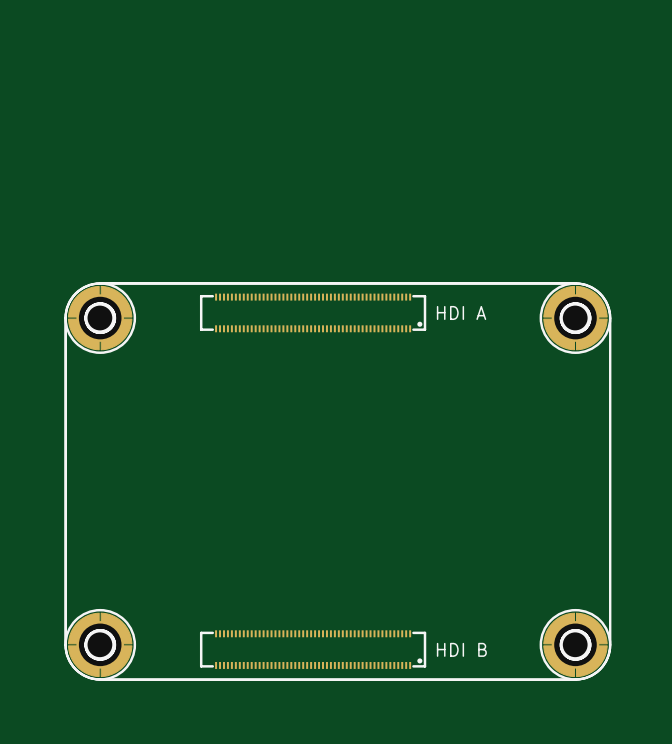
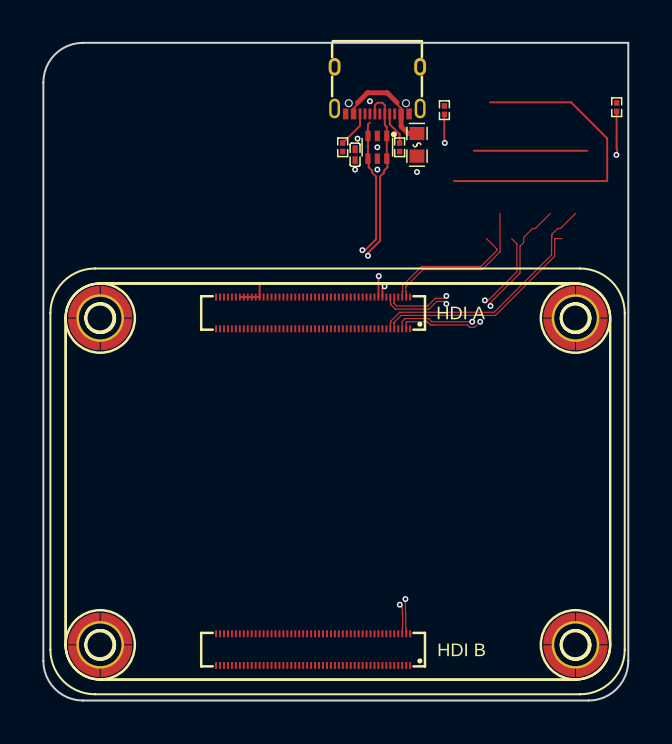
board edge: none -> (82, 42) (628, 42) (628, 660) (625, 676) (612, 692) (598, 699) (588, 700) (82, 700) (67, 697) (51, 685) (46, 676) (43, 660) (43, 82) (46, 67) (54, 54) (67, 45) (82, 42)
part: none -> (377, 79)
via: none -> (369, 101)
track: none -> (490, 102) (571, 102) (607, 138) (607, 181) (453, 181)
part: none -> (616, 107)
part: none -> (444, 110)
track: none -> (616, 111) (616, 154)
track: none -> (353, 113) (353, 108) (367, 92) (387, 92) (401, 108) (401, 126) (408, 133) (416, 133)
track: none -> (360, 113) (360, 125) (342, 143)
track: none -> (374, 113) (374, 105) (377, 102) (382, 102) (384, 105) (384, 125) (386, 126) (386, 158)
track: none -> (389, 113) (389, 124) (399, 134) (399, 143)
track: none -> (444, 114) (444, 142)
track: none -> (369, 122) (367, 124) (367, 158)
via: none -> (357, 138)
via: none -> (444, 142)
part: none -> (416, 144)
part: none -> (342, 147)
via: none -> (377, 147)
part: none -> (379, 147)
part: none -> (399, 147)
track: none -> (473, 150) (587, 150)
part: none -> (355, 154)
via: none -> (616, 154)
track: none -> (368, 159) (368, 167) (376, 176) (376, 239) (365, 250) (362, 250)
track: none -> (387, 159) (387, 167) (380, 176) (380, 240) (367, 252) (367, 255)
via: none -> (355, 169)
via: none -> (377, 169)
via: none -> (416, 172)
track: none -> (500, 213) (500, 251) (482, 269) (422, 269) (405, 286) (406, 297)
track: none -> (550, 213) (523, 237) (523, 242) (520, 246) (520, 273) (490, 302) (490, 305)
track: none -> (575, 213) (551, 234) (551, 254) (494, 312) (399, 312) (390, 321) (390, 328)
track: none -> (486, 238) (496, 250) (480, 266) (421, 266) (402, 285) (402, 297)
track: none -> (511, 238) (516, 243) (516, 271) (488, 300) (484, 300)
track: none -> (554, 238) (561, 238)
track: none -> (554, 238) (554, 256) (495, 315) (400, 315) (393, 322) (394, 328)
via: none -> (362, 250)
via: none -> (367, 255)
line: none -> (94, 268) (580, 268) (594, 270) (607, 278) (620, 293) (624, 313) (624, 649) (622, 664) (615, 677) (599, 689) (580, 694) (94, 694) (80, 691) (67, 684) (54, 669) (50, 649) (50, 308) (54, 293) (67, 278) (80, 270) (94, 268)
track: none -> (378, 276) (378, 297)
via: none -> (378, 276)
track: none -> (258, 283) (259, 297) (239, 297)
track: none -> (384, 286) (382, 288) (382, 297)
via: none -> (384, 286)
track: none -> (446, 295) (444, 298) (435, 298) (427, 305) (396, 305) (393, 303) (394, 297)
via: none -> (446, 295)
track: none -> (390, 297) (390, 304) (395, 309) (429, 309) (436, 301) (444, 301) (446, 303)
via: none -> (484, 300)
via: none -> (446, 303)
via: none -> (490, 305)
track: none -> (472, 321) (431, 321) (428, 318) (405, 318) (402, 321) (402, 328)
via: none -> (472, 321)
via: none -> (480, 321)
track: none -> (476, 324) (469, 327) (467, 324) (430, 324) (427, 321) (406, 321) (406, 328)
track: none -> (405, 599) (406, 633)
via: none -> (405, 599)
track: none -> (399, 604) (402, 607) (402, 633)
via: none -> (399, 604)

